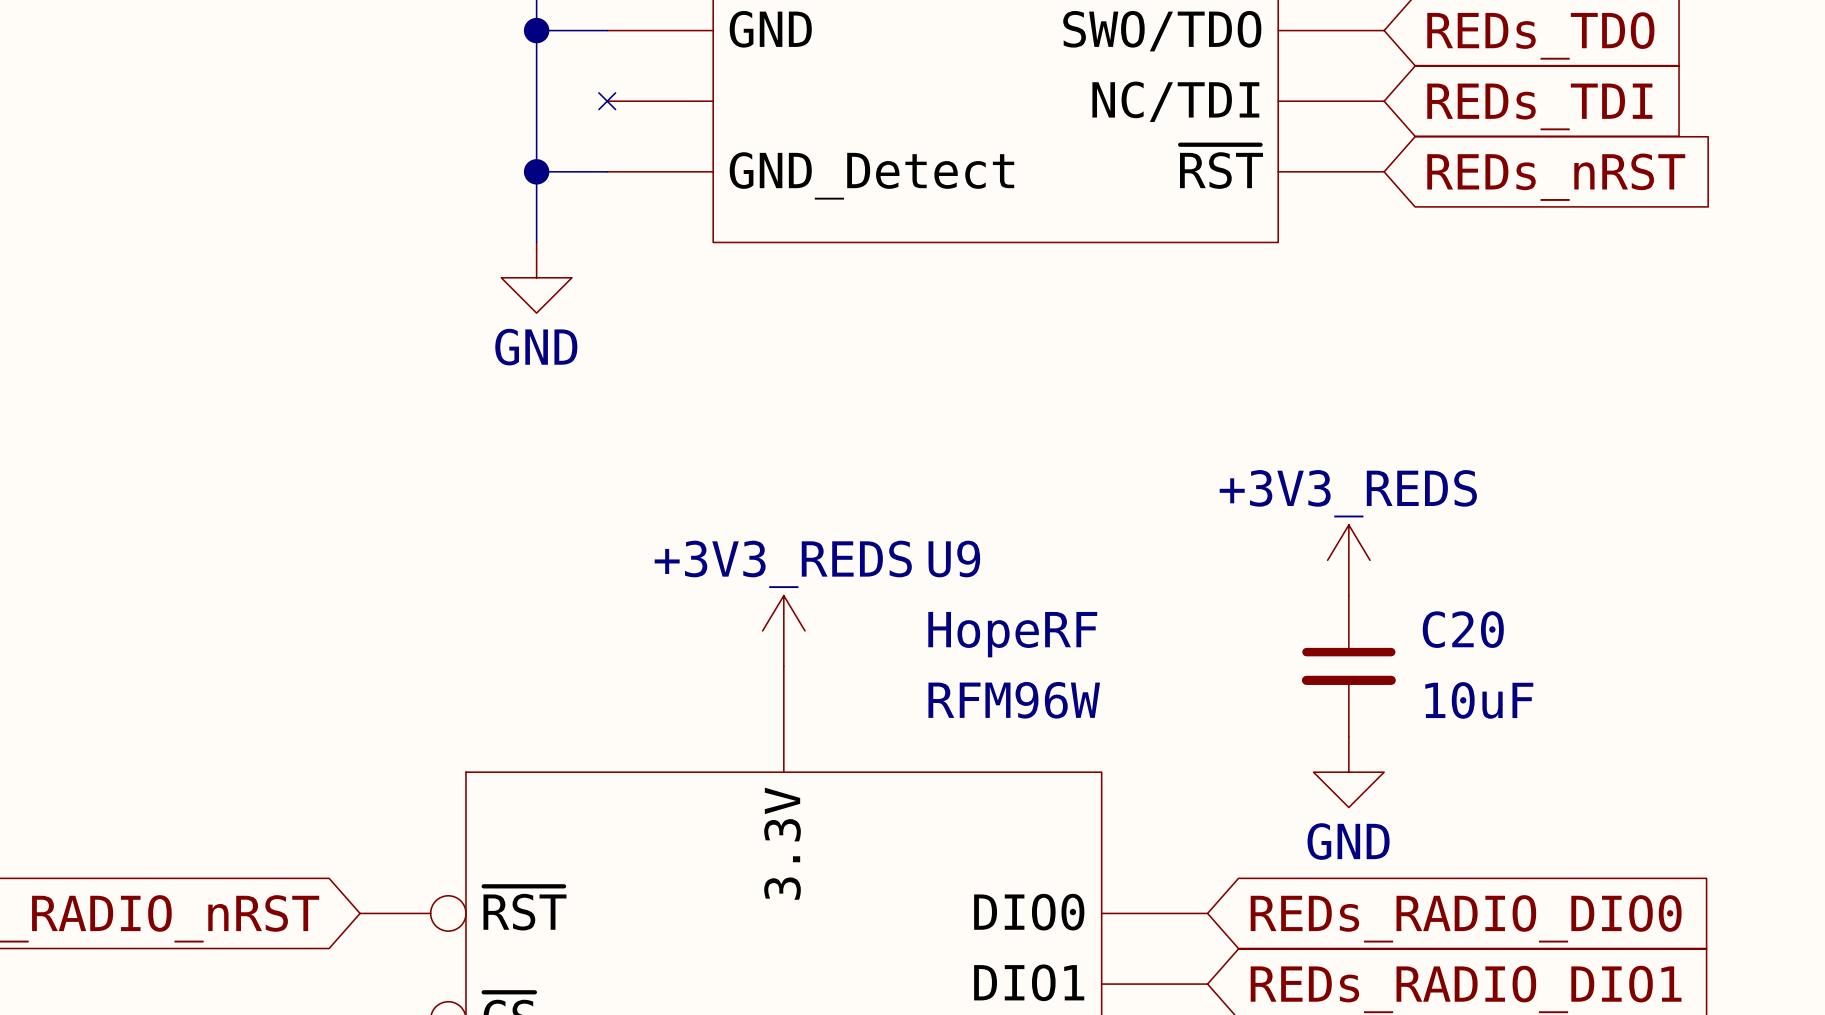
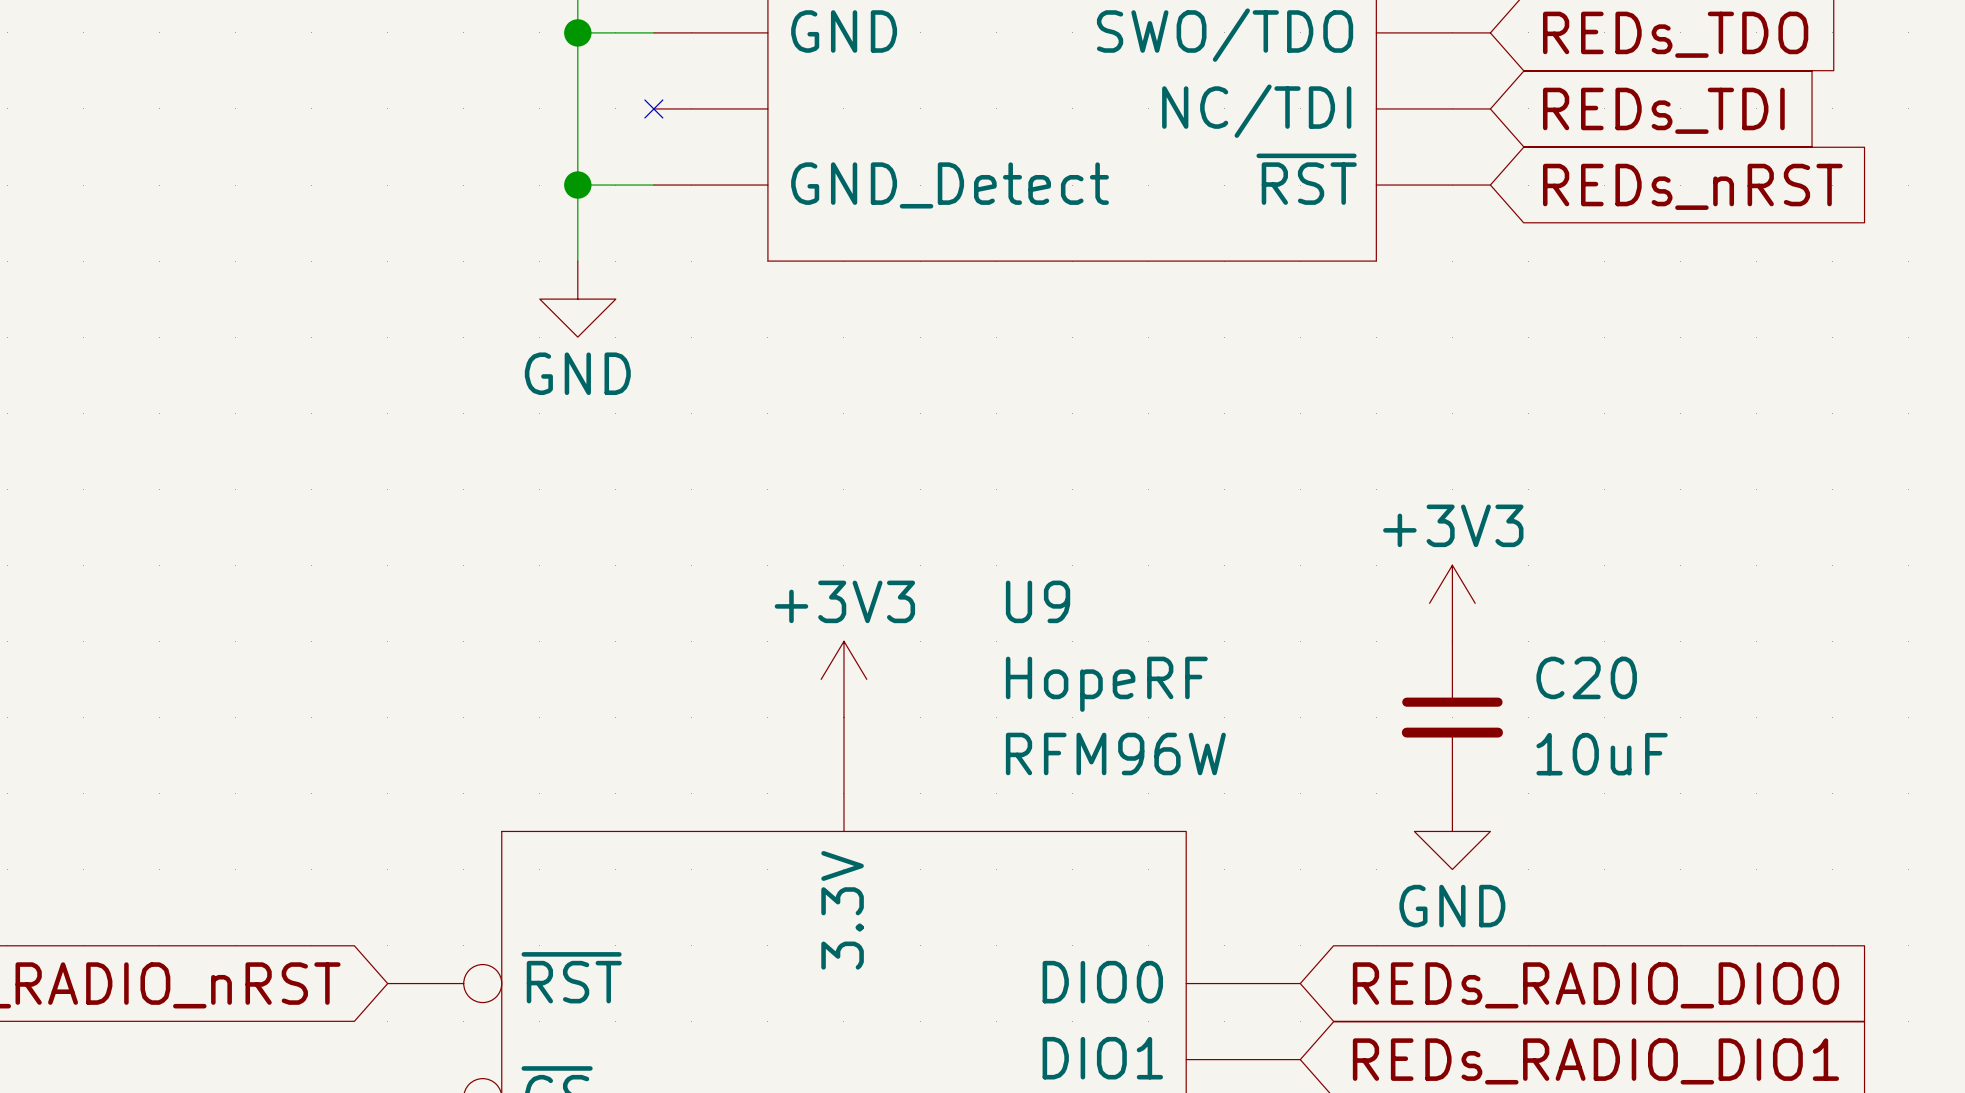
power symbol: +3V3_REDS (1348, 560) -> +3V3 (1452, 603)
power symbol: +3V3_REDS (783, 630) -> +3V3 (843, 679)

